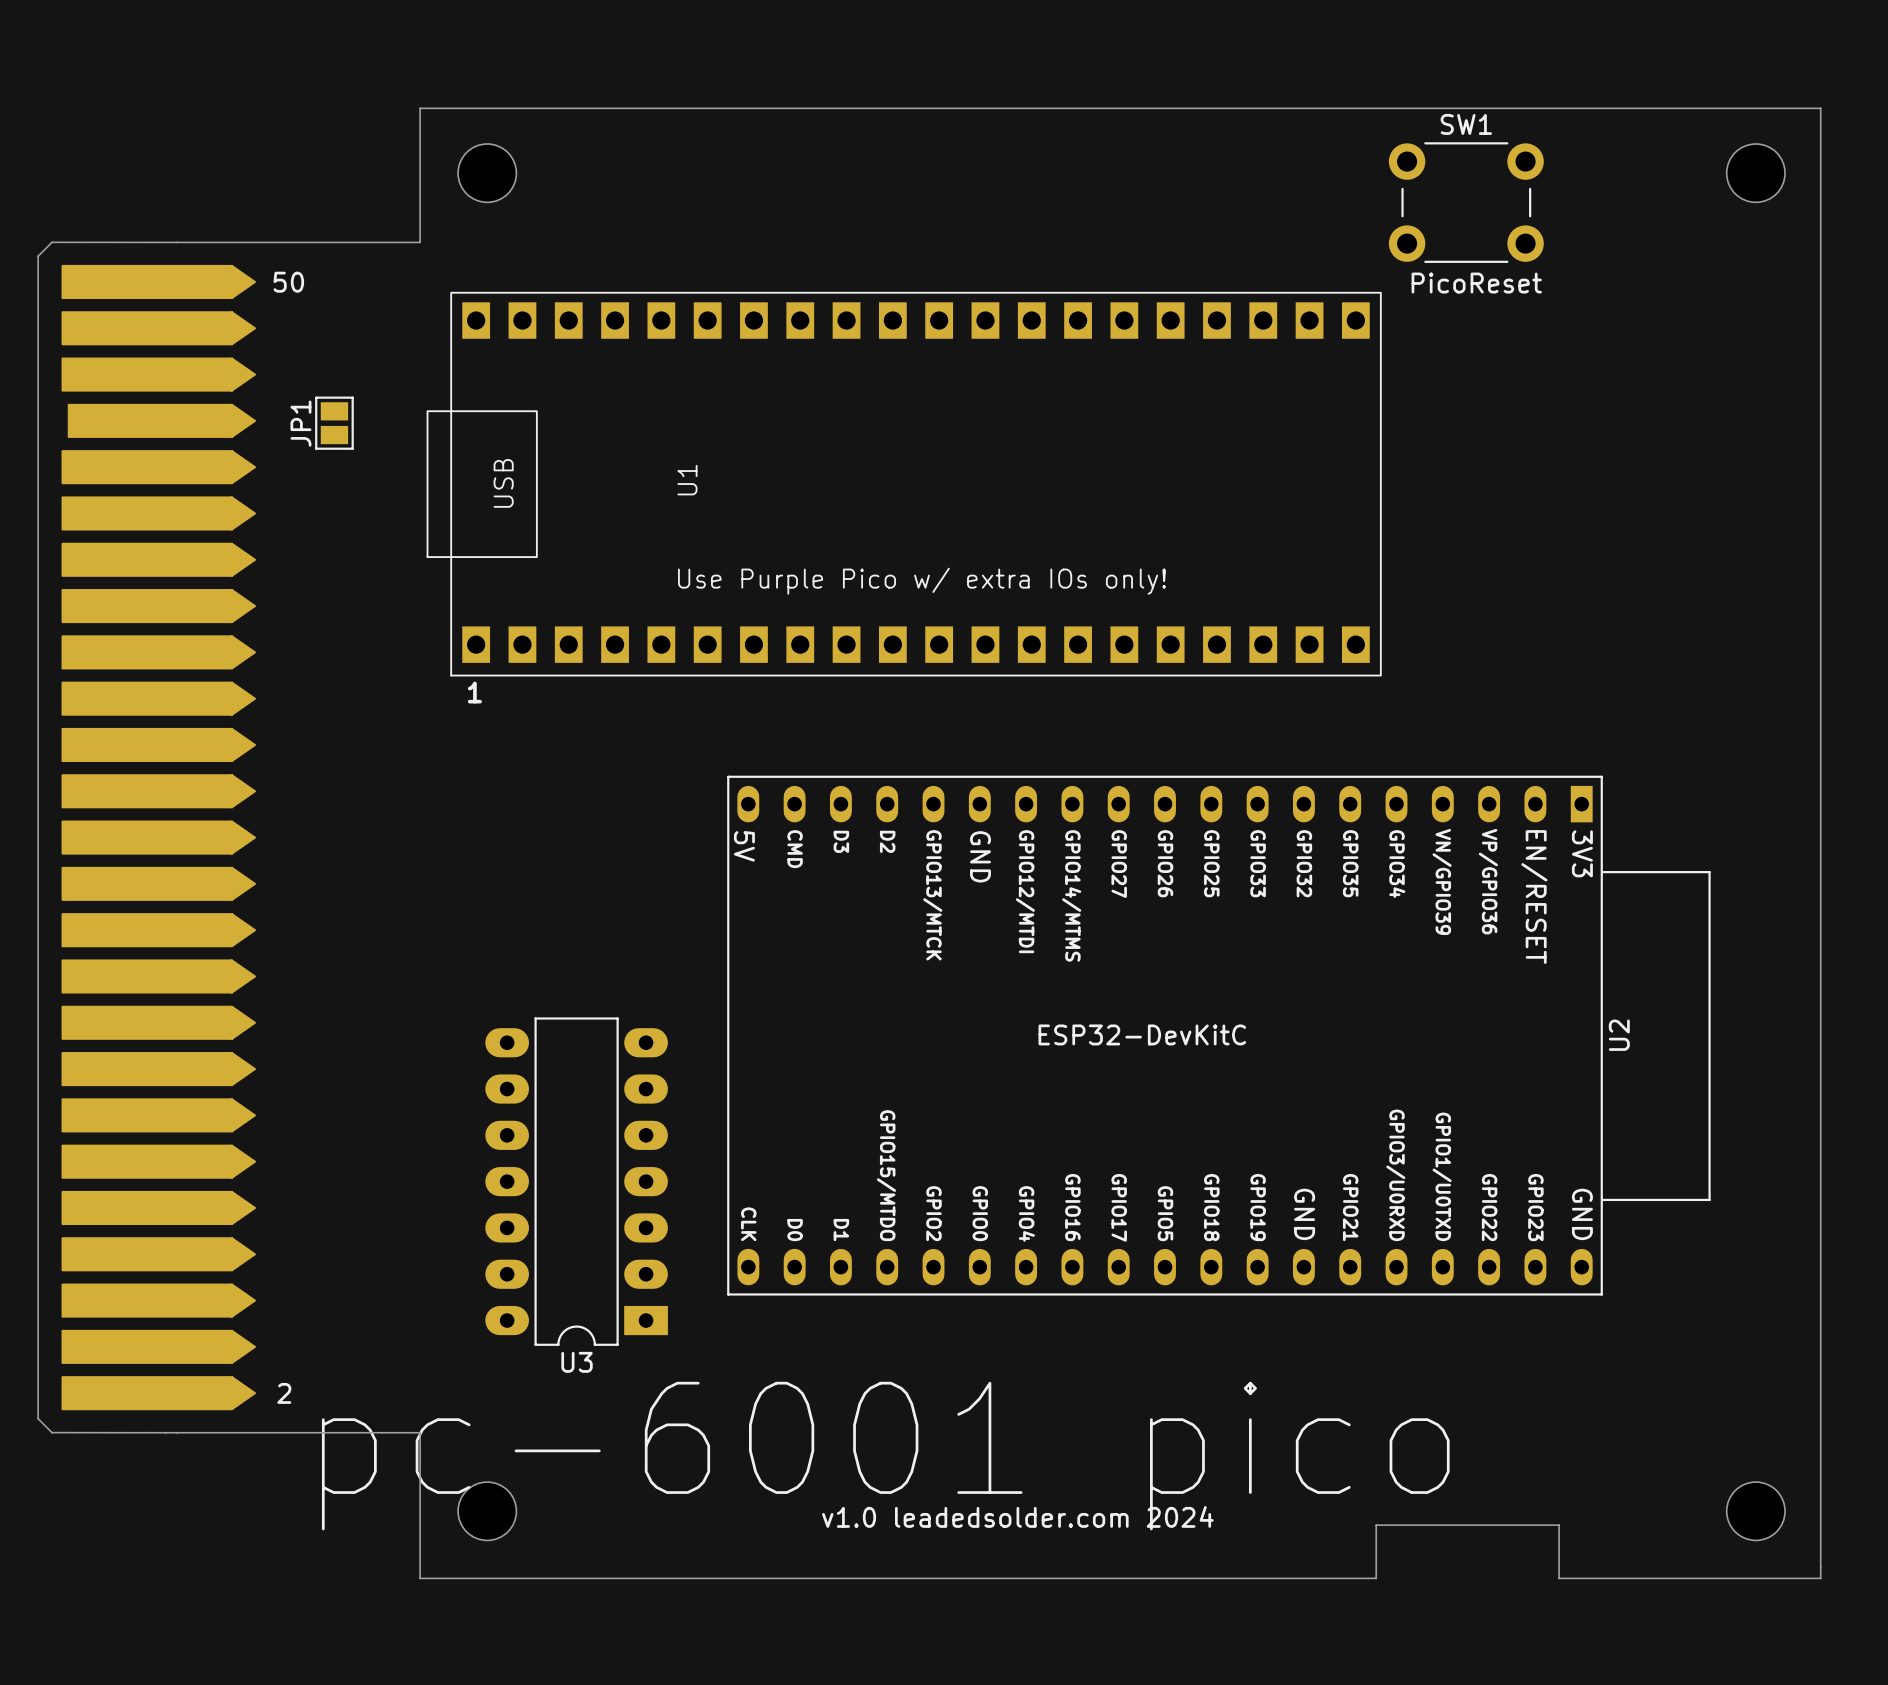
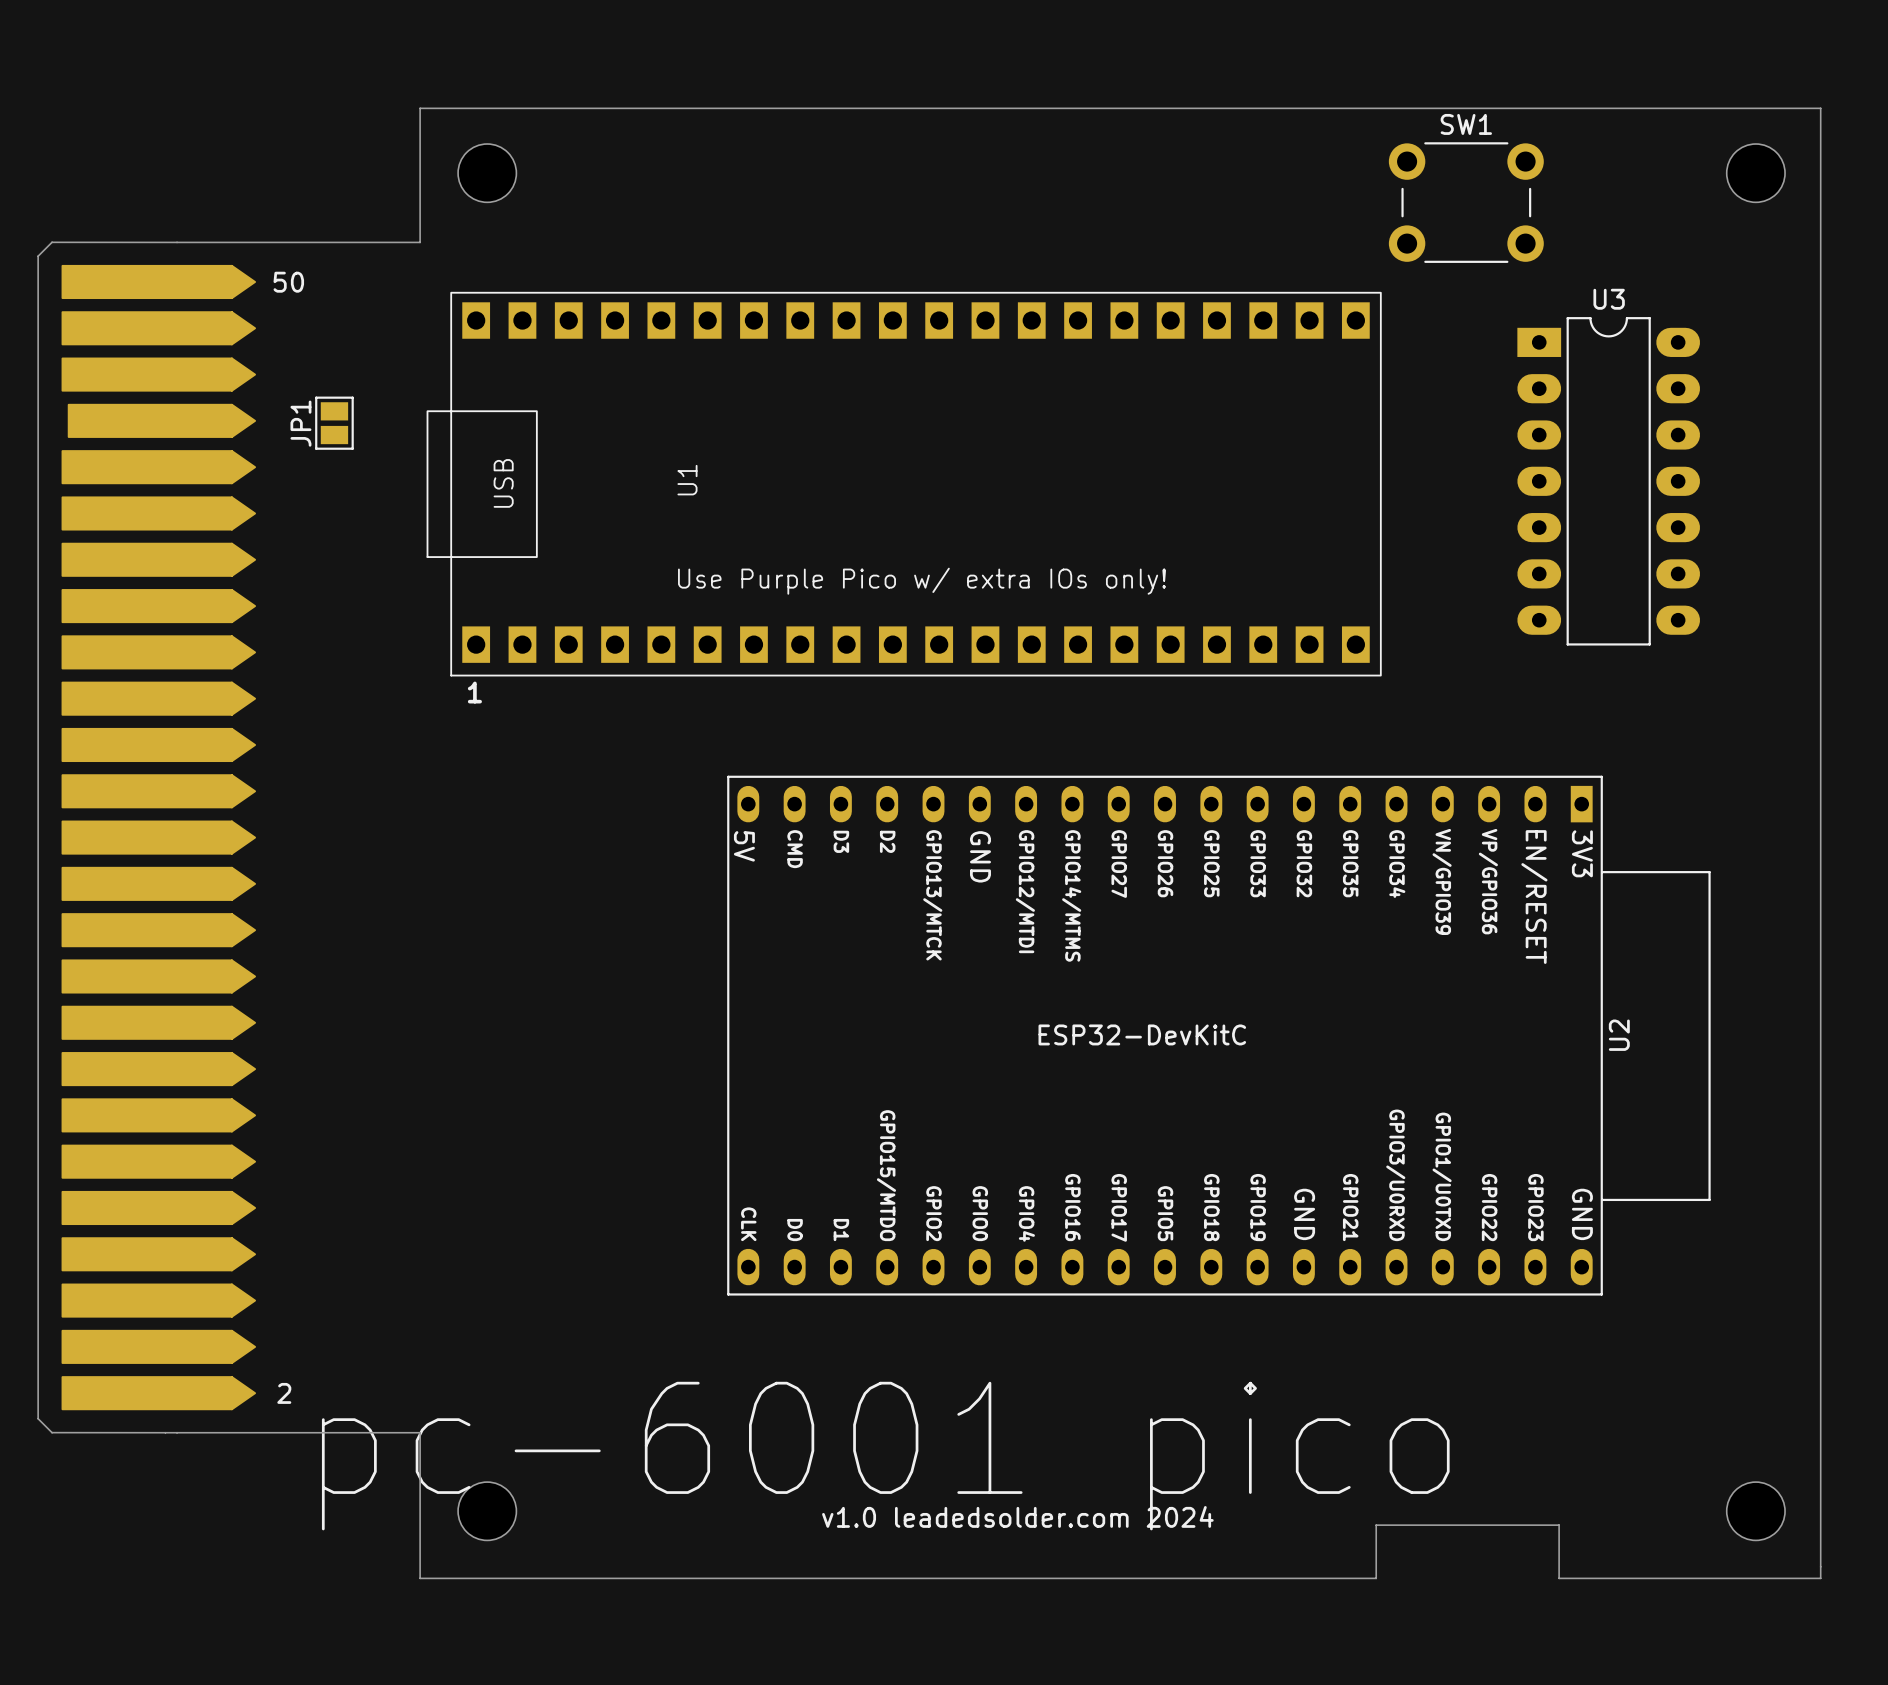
SW1 value: PicoReset (1476, 283) -> none
U3 rotation: 0° (576, 1181) -> 180° (1608, 481)
U3 position: (576, 1181) -> (1608, 481)

